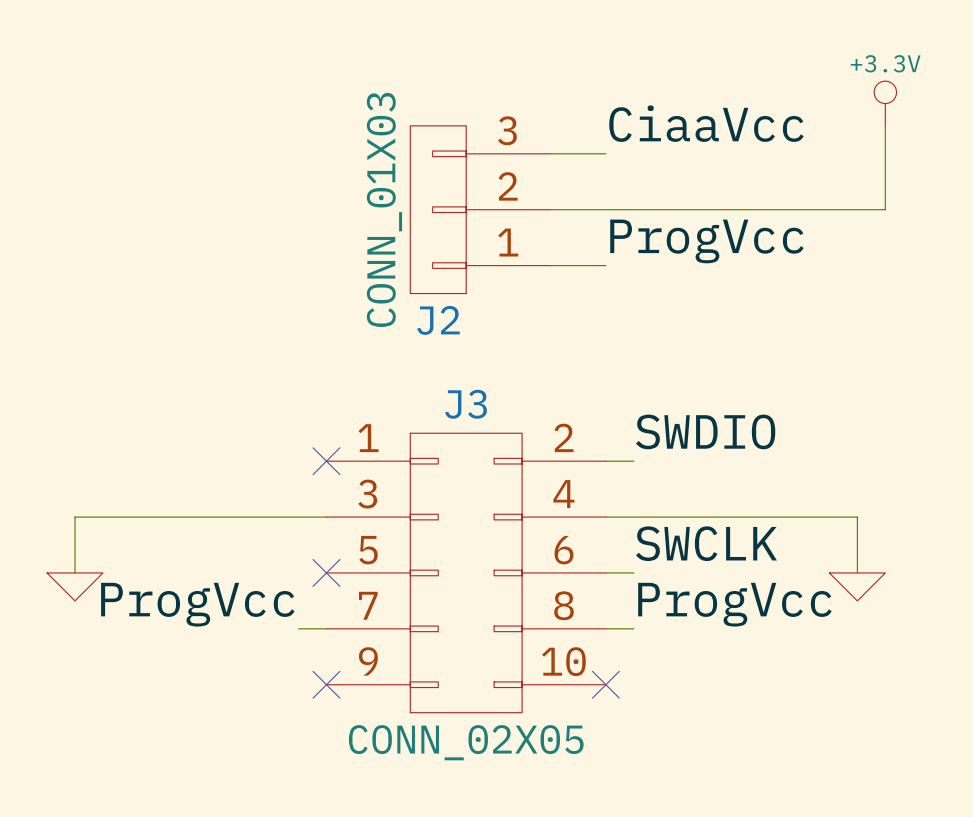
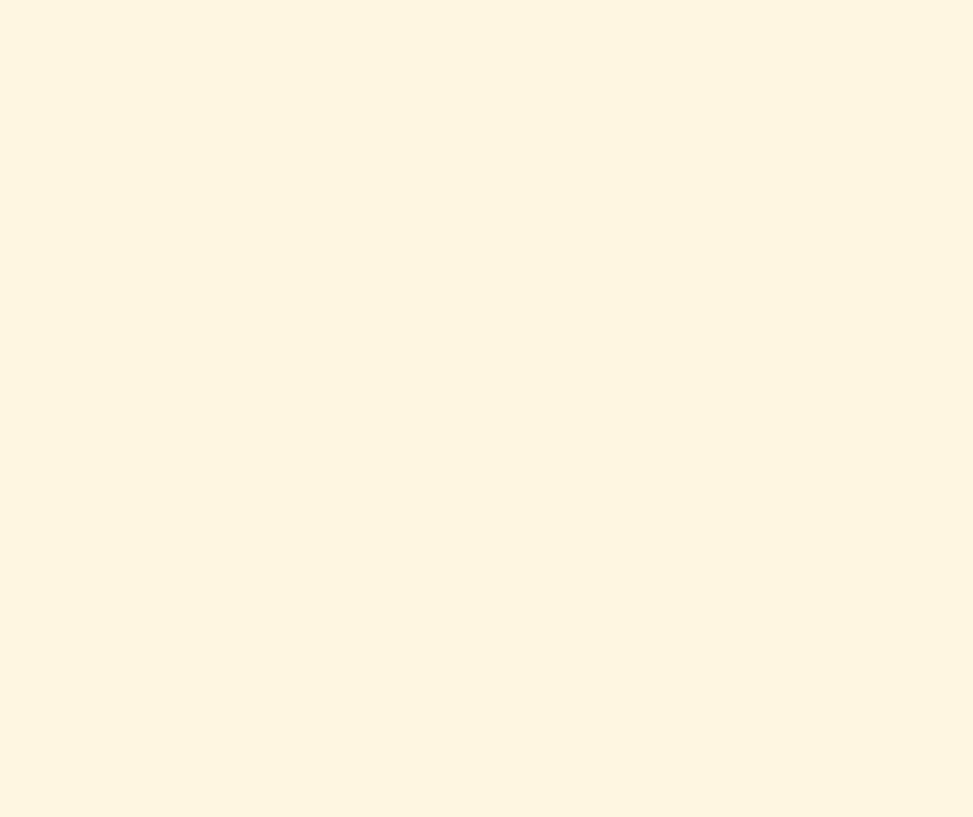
power symbol: +3.3V (885, 103) -> none
label: CiaaVcc (706, 123) -> none
wire: (885, 125) (885, 209) (550, 209) -> none
wire: (550, 153) (605, 153) -> none
J2: CONN_01X03 (480, 209) -> none
label: ProgVcc (706, 241) -> none
wire: (550, 265) (605, 265) -> none
label: SWDIO (705, 431) -> none
no-connect mark: (326, 461) -> none
wire: (605, 461) (633, 461) -> none
wire: (326, 517) (74, 517) (74, 572) -> none
wire: (605, 517) (857, 517) (857, 572) -> none
label: SWCLK (706, 543) -> none
no-connect mark: (326, 572) -> none
J3: CONN_02X05 (466, 572) -> none
wire: (605, 572) (633, 572) -> none
power symbol: (74, 586) -> none
power symbol: (857, 586) -> none
label: ProgVcc (197, 604) -> none
label: ProgVcc (734, 604) -> none
wire: (298, 628) (326, 628) -> none
wire: (605, 628) (633, 628) -> none
no-connect mark: (326, 684) -> none
no-connect mark: (605, 684) -> none

